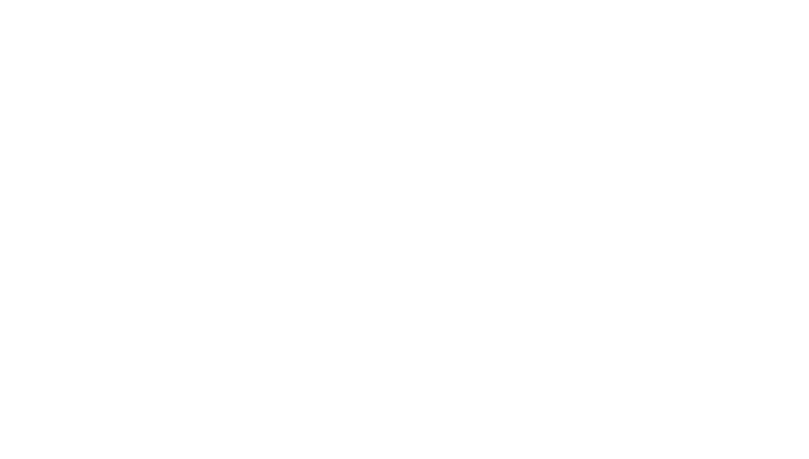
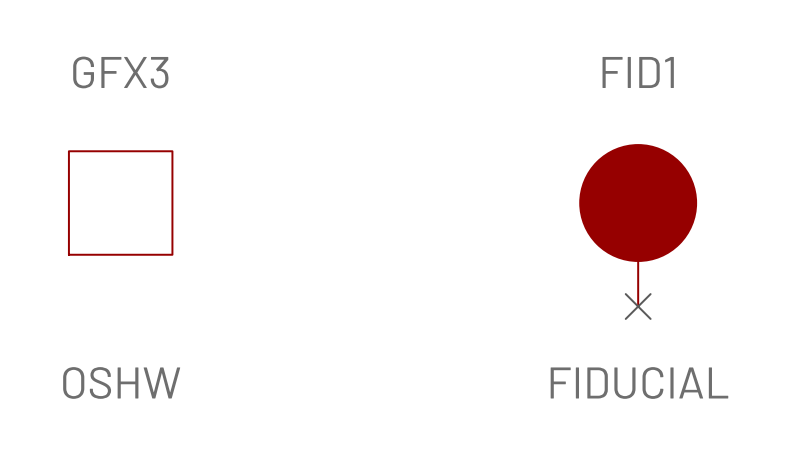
GFX3: none -> OSHW (120, 203)
FID1: none -> FIDUCIAL (638, 225)
no-connect mark: none -> (638, 306)

